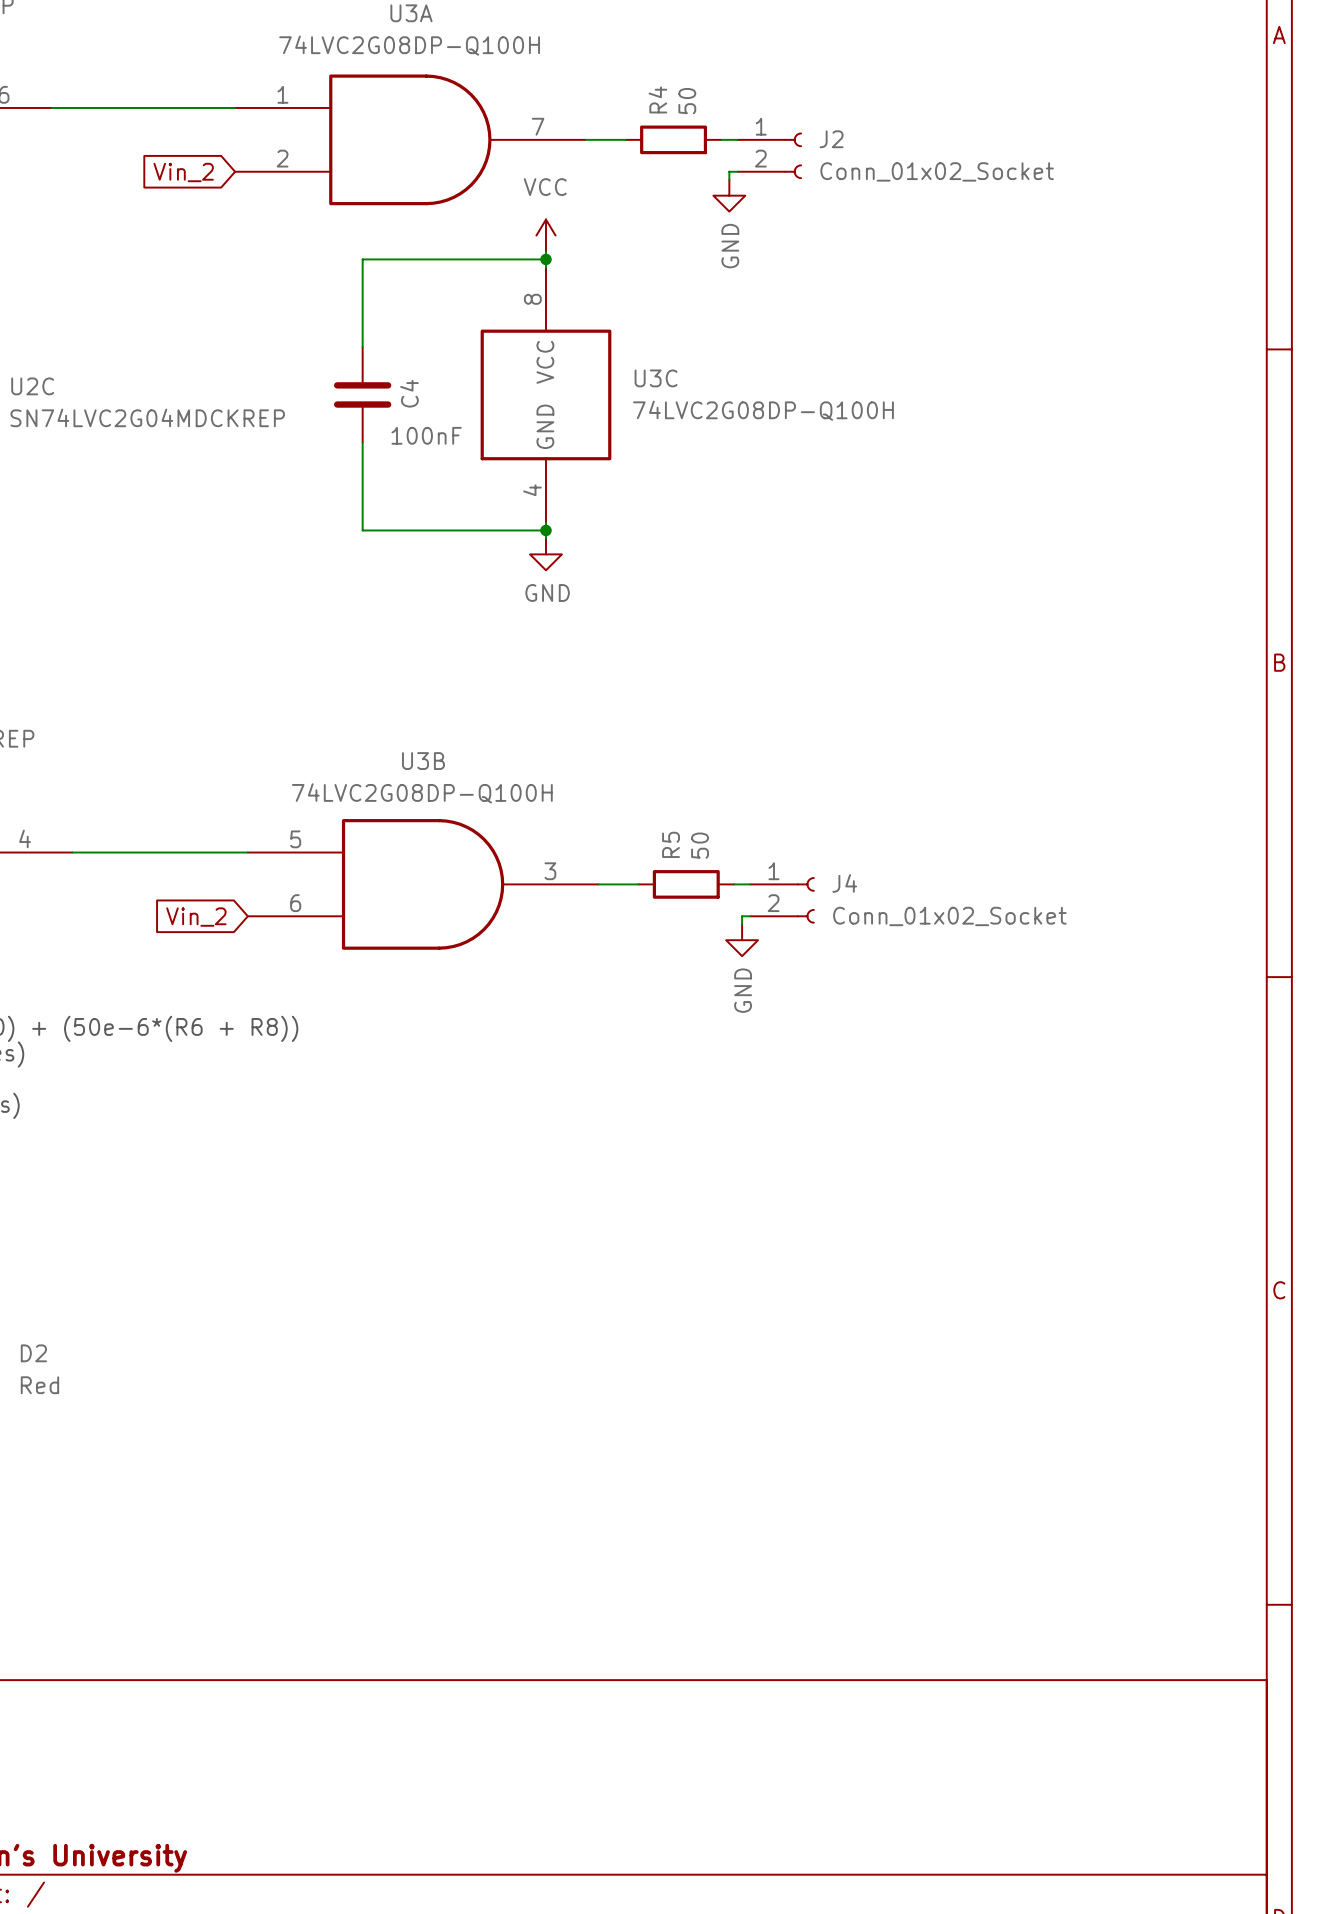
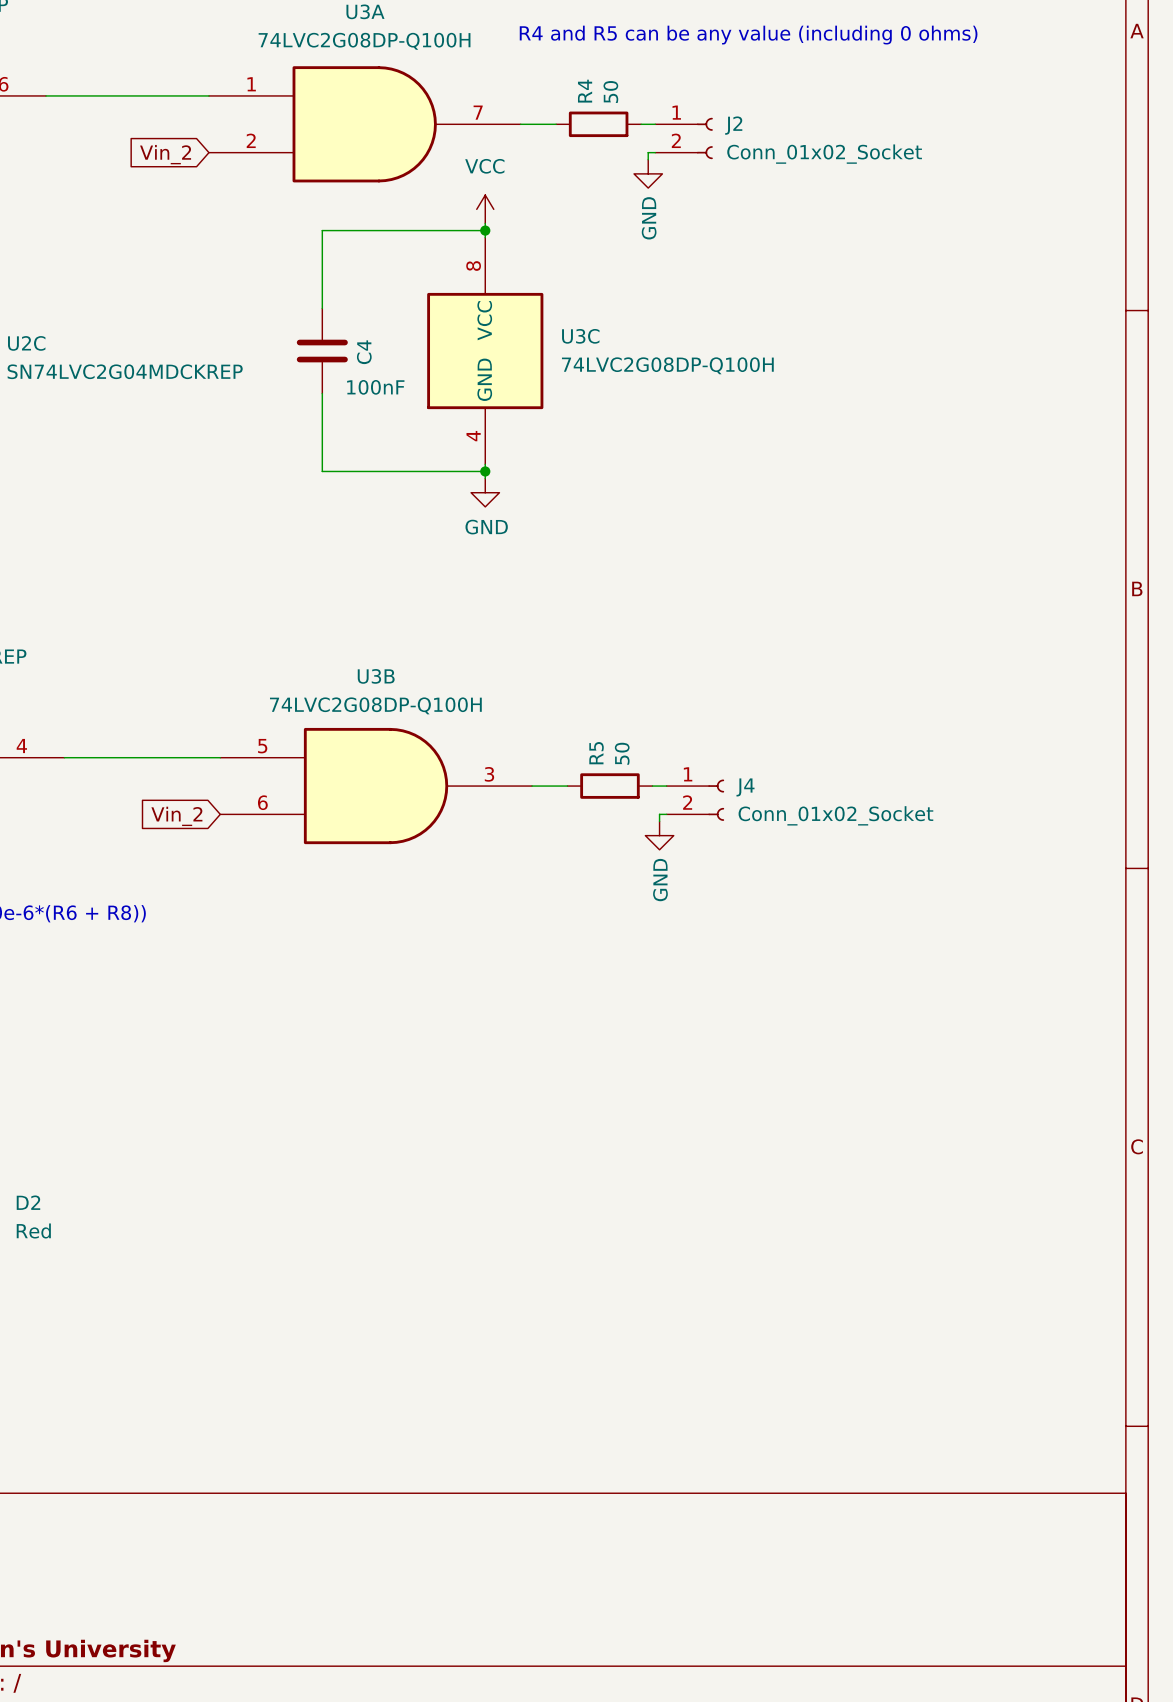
text: none -> R4 and R5 can be any value (including 0 ohms) (748, 35)

